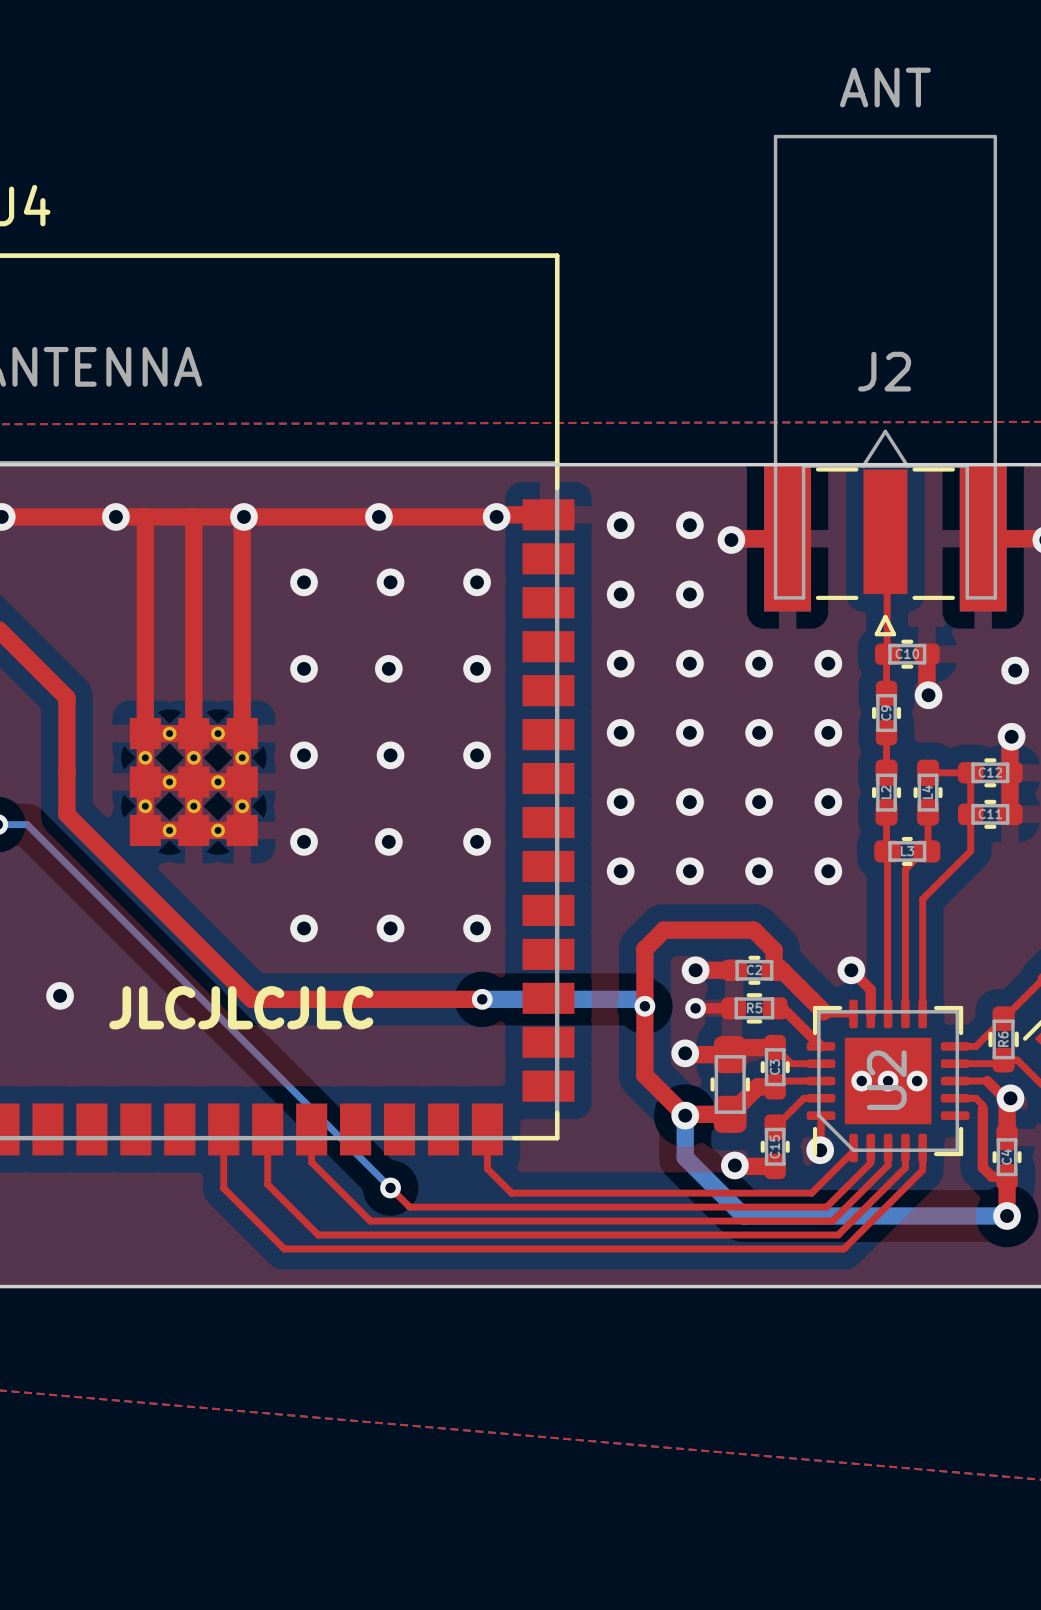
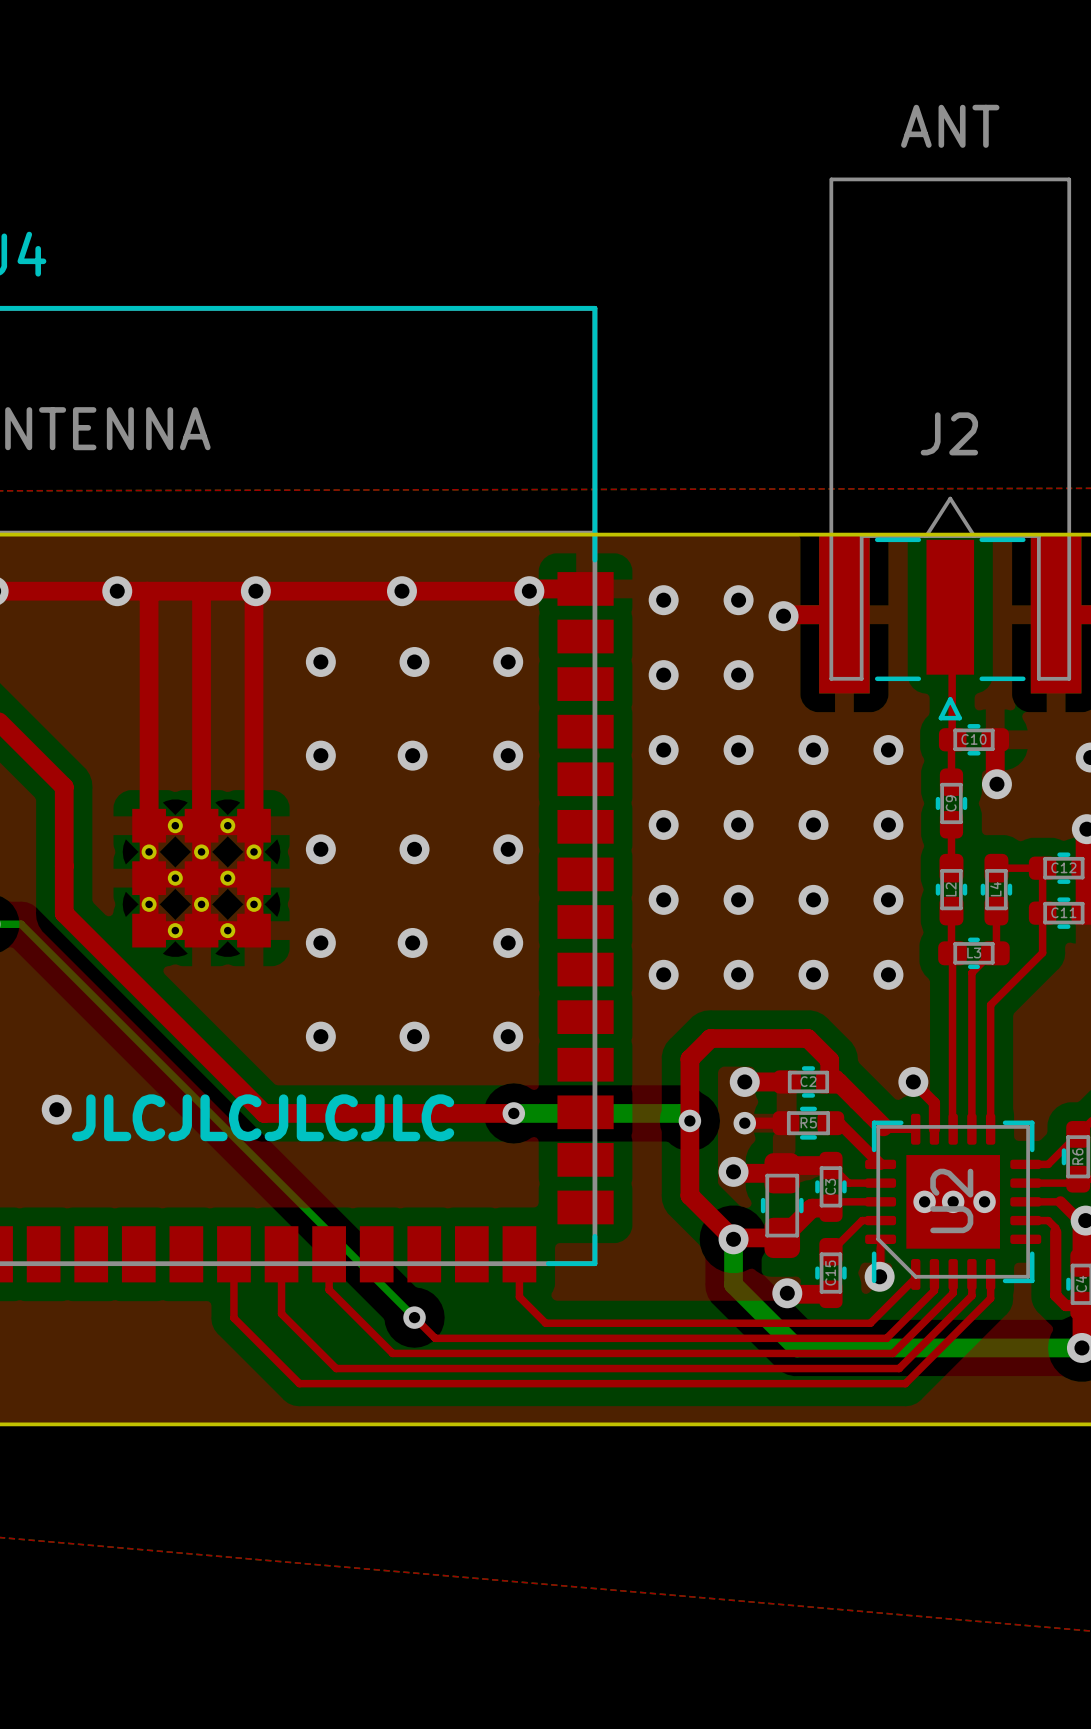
text: JLCJLCJLC (241, 1007) -> JLCJLCJLCJLC (263, 1117)

